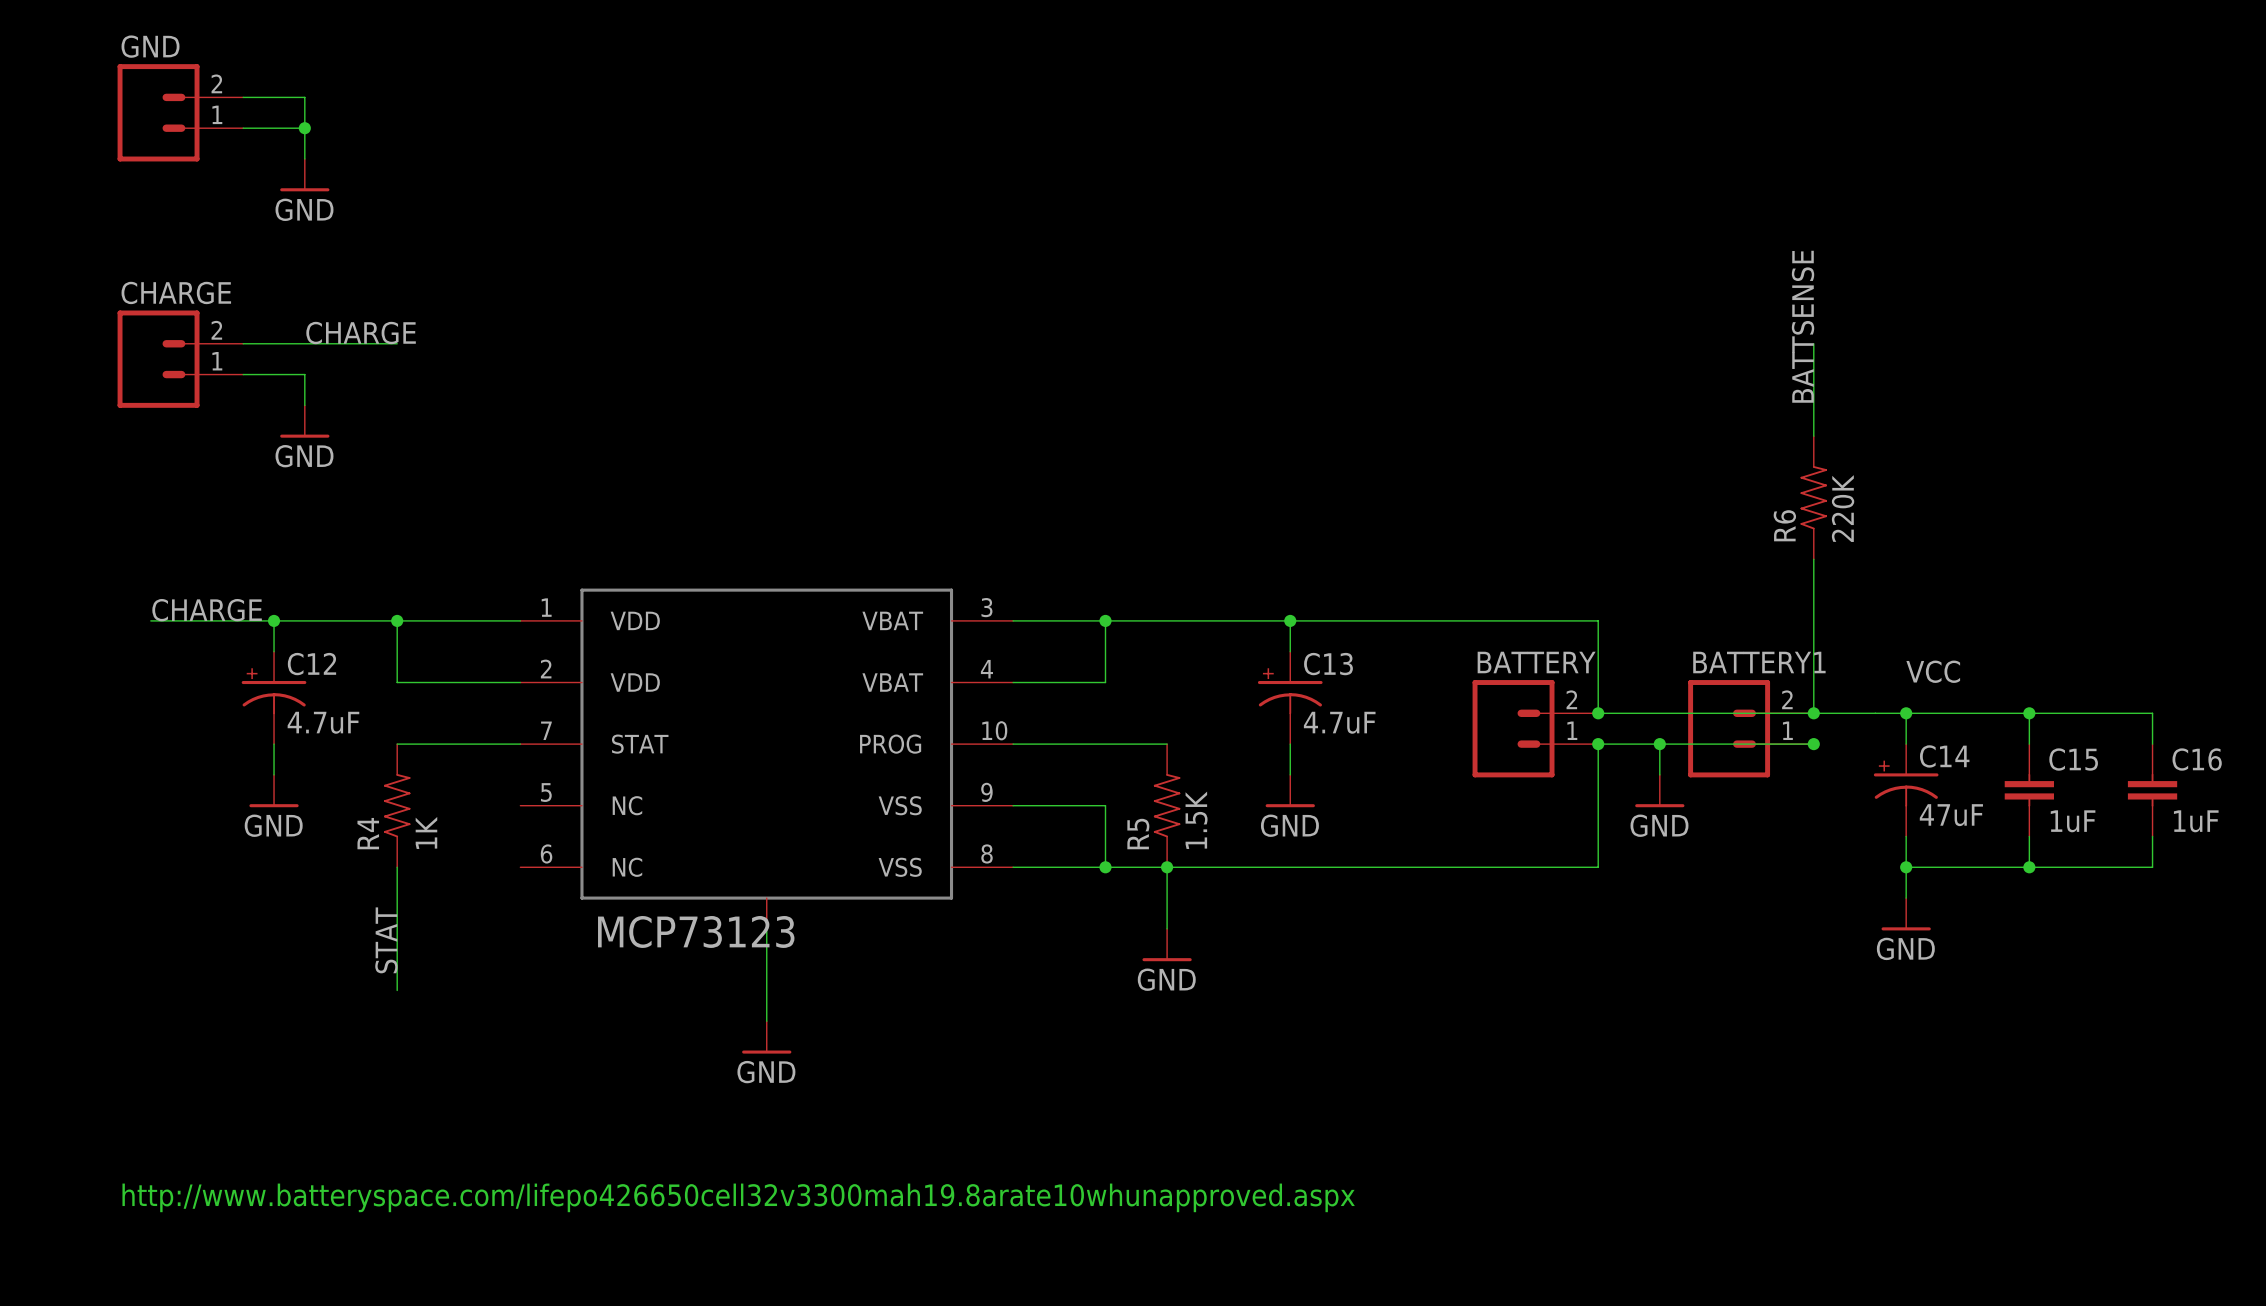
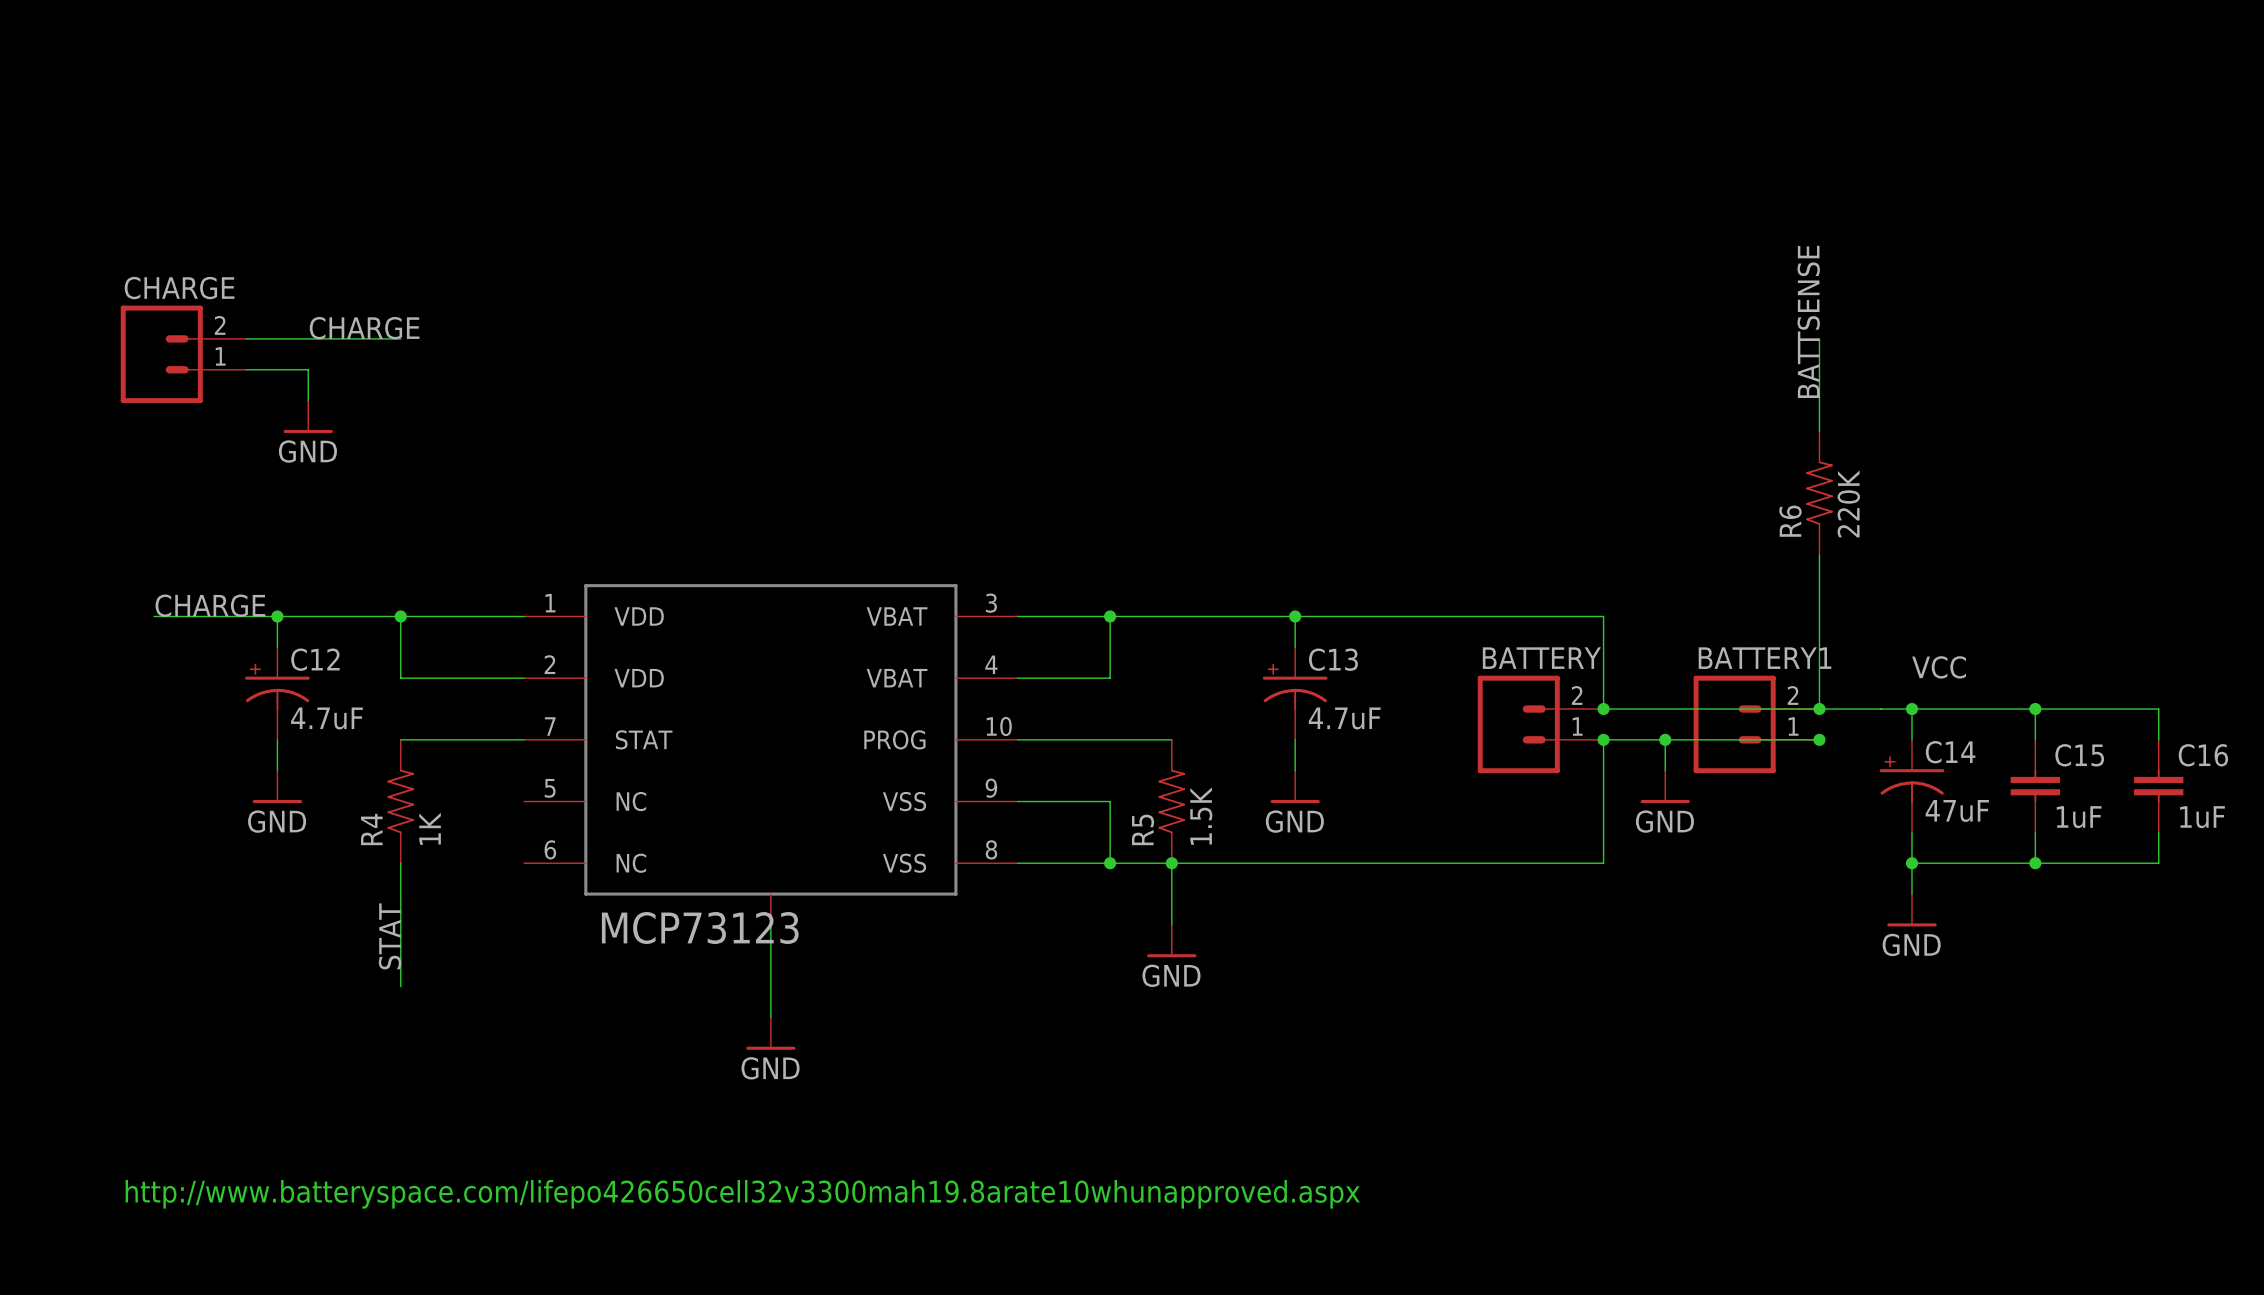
wire: (243, 97) (304, 97) (304, 158) -> none
GND: (180, 112) -> none
wire: (243, 128) (304, 128) -> none
junction: (304, 128) -> none
power symbol: GND (304, 175) -> none

